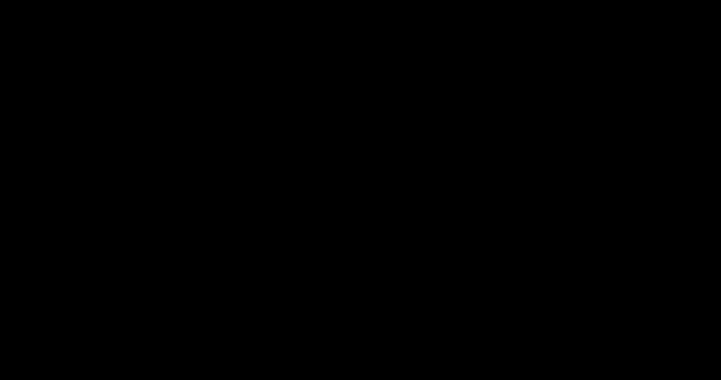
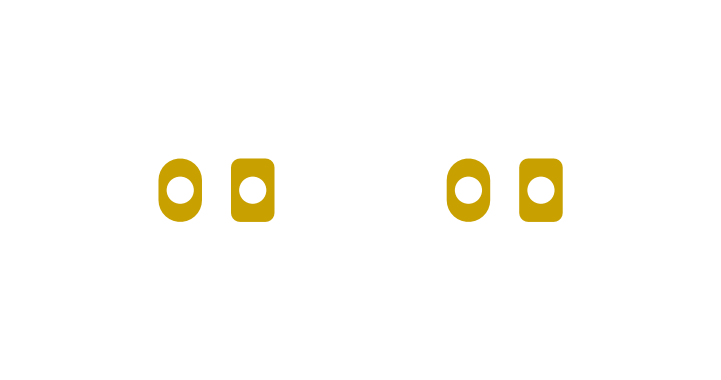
part: none -> (216, 190)
part: none -> (504, 190)

